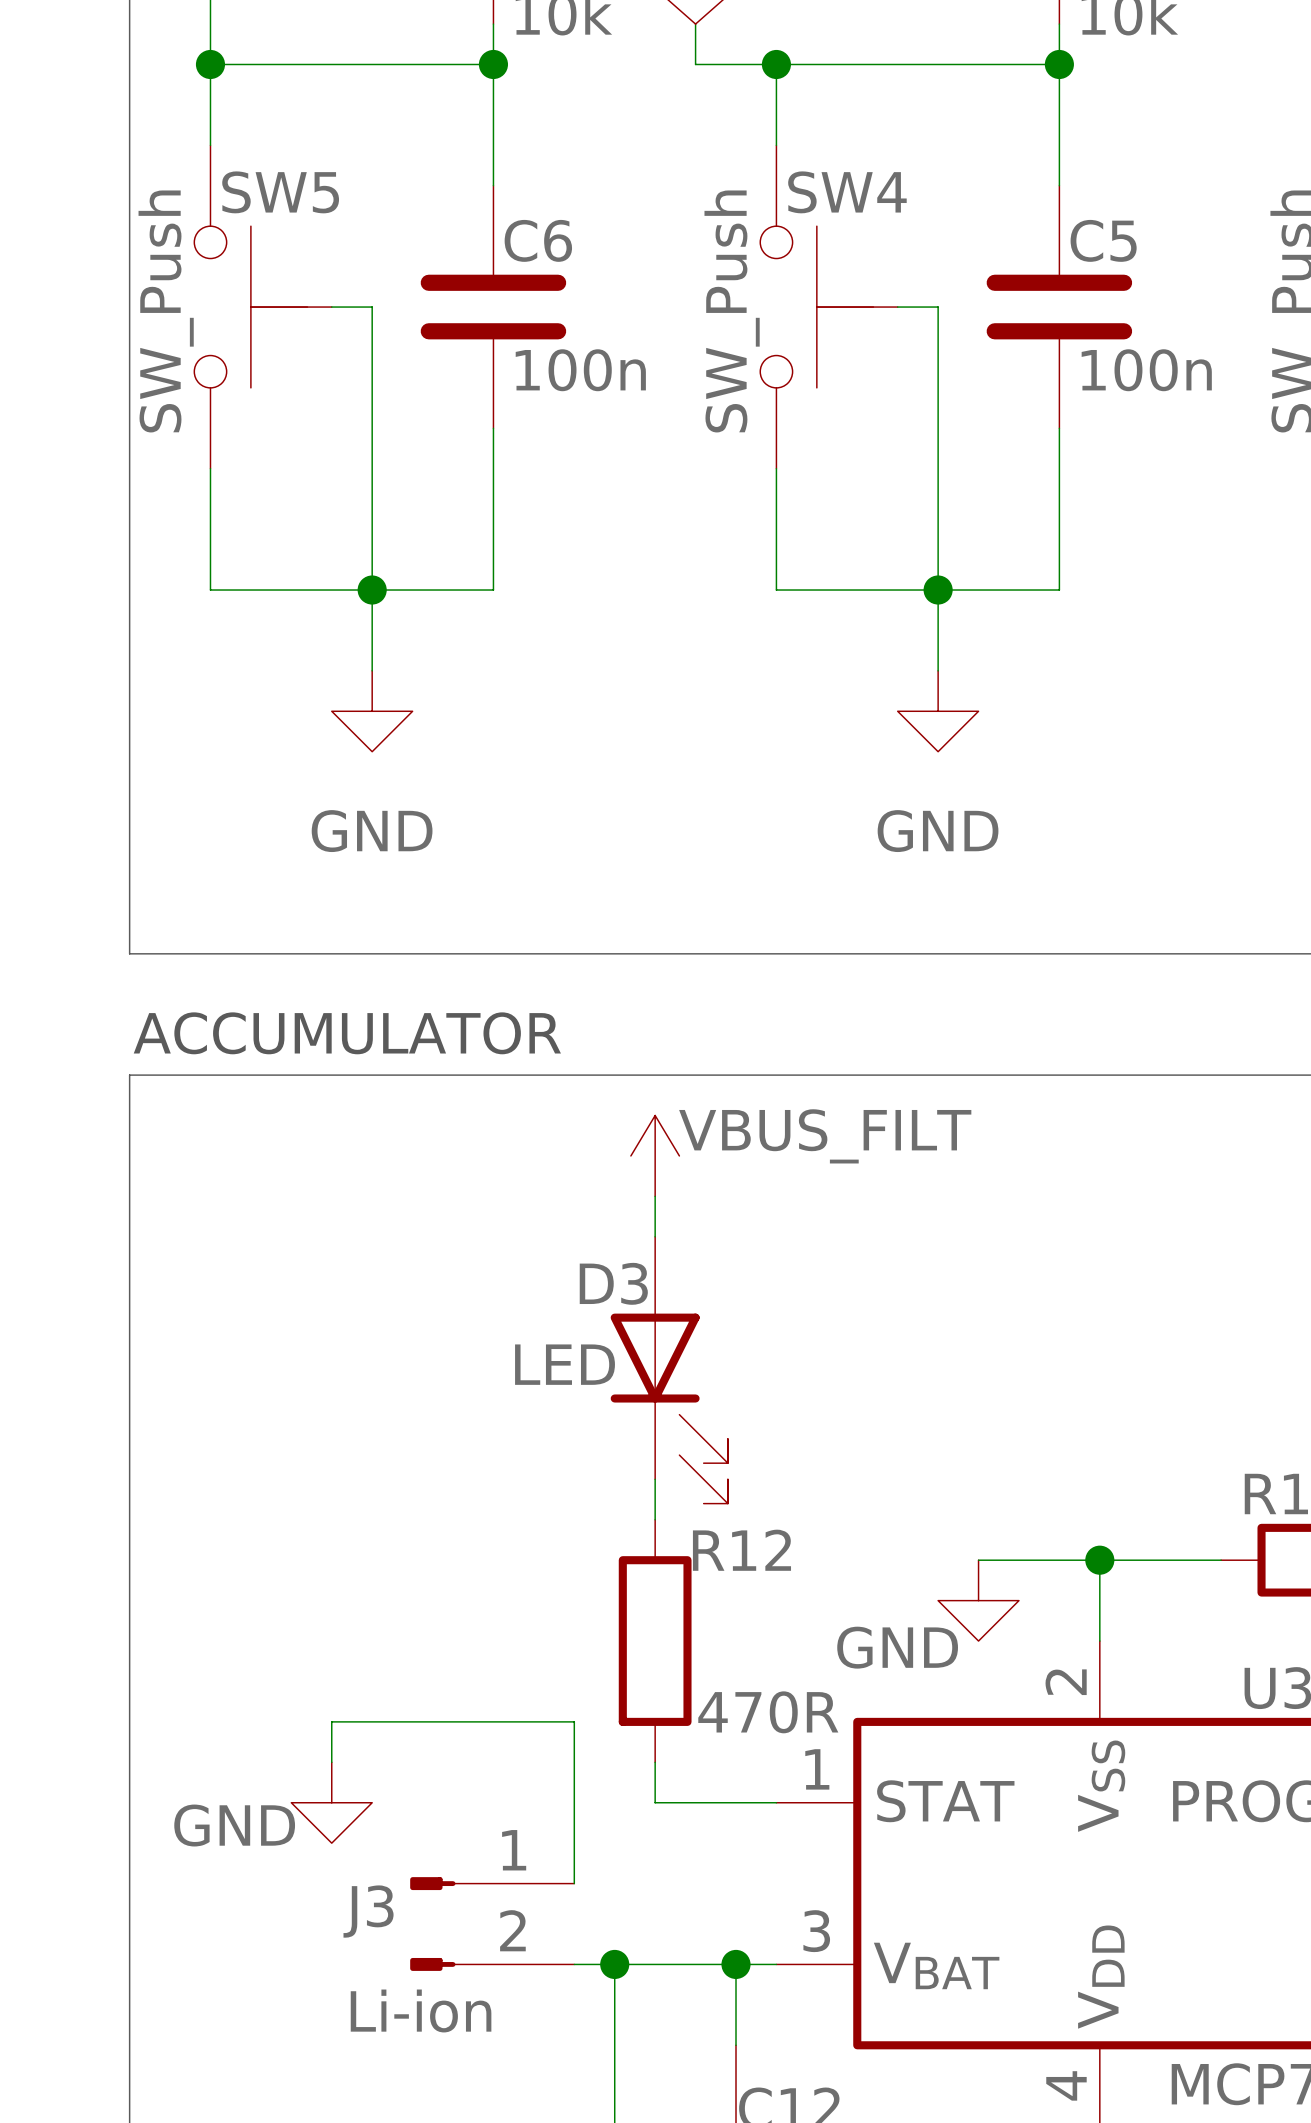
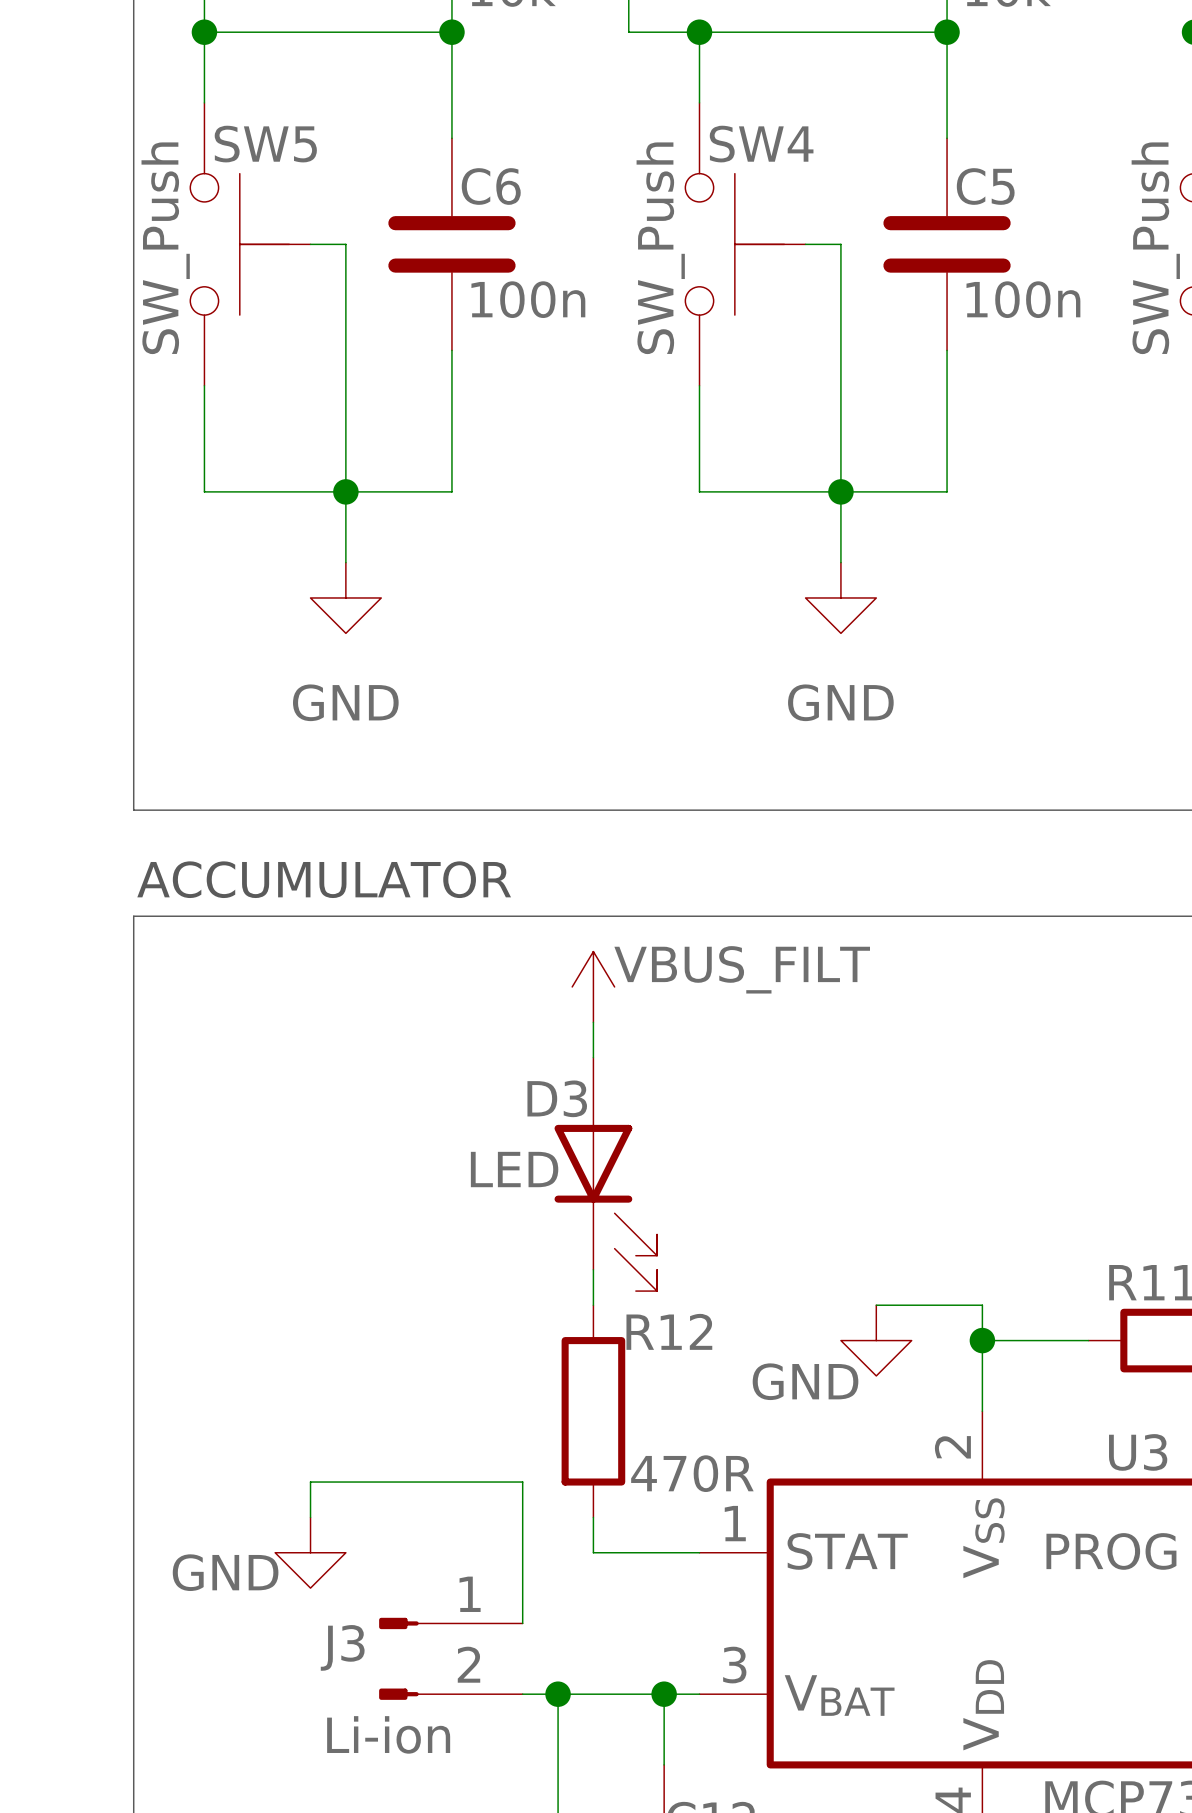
wire: (978, 1560) (1099, 1560) -> (876, 1305) (982, 1305) (982, 1340)
power symbol position: GND (978, 1600) -> GND (876, 1340)

